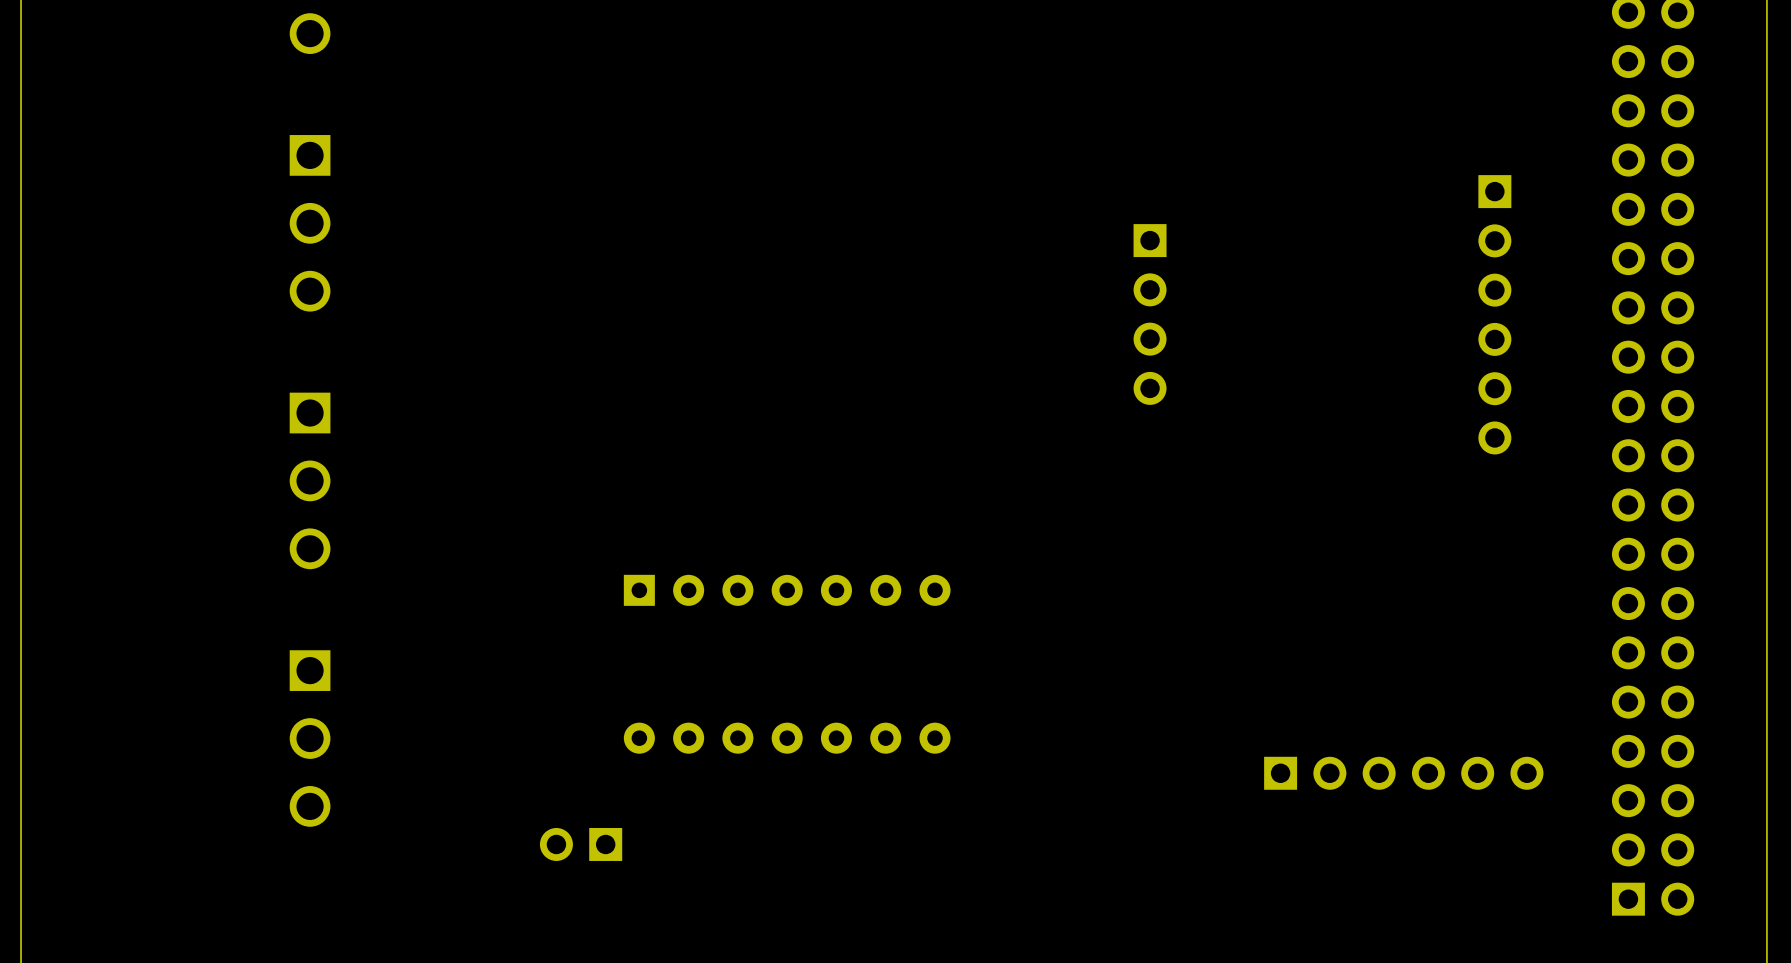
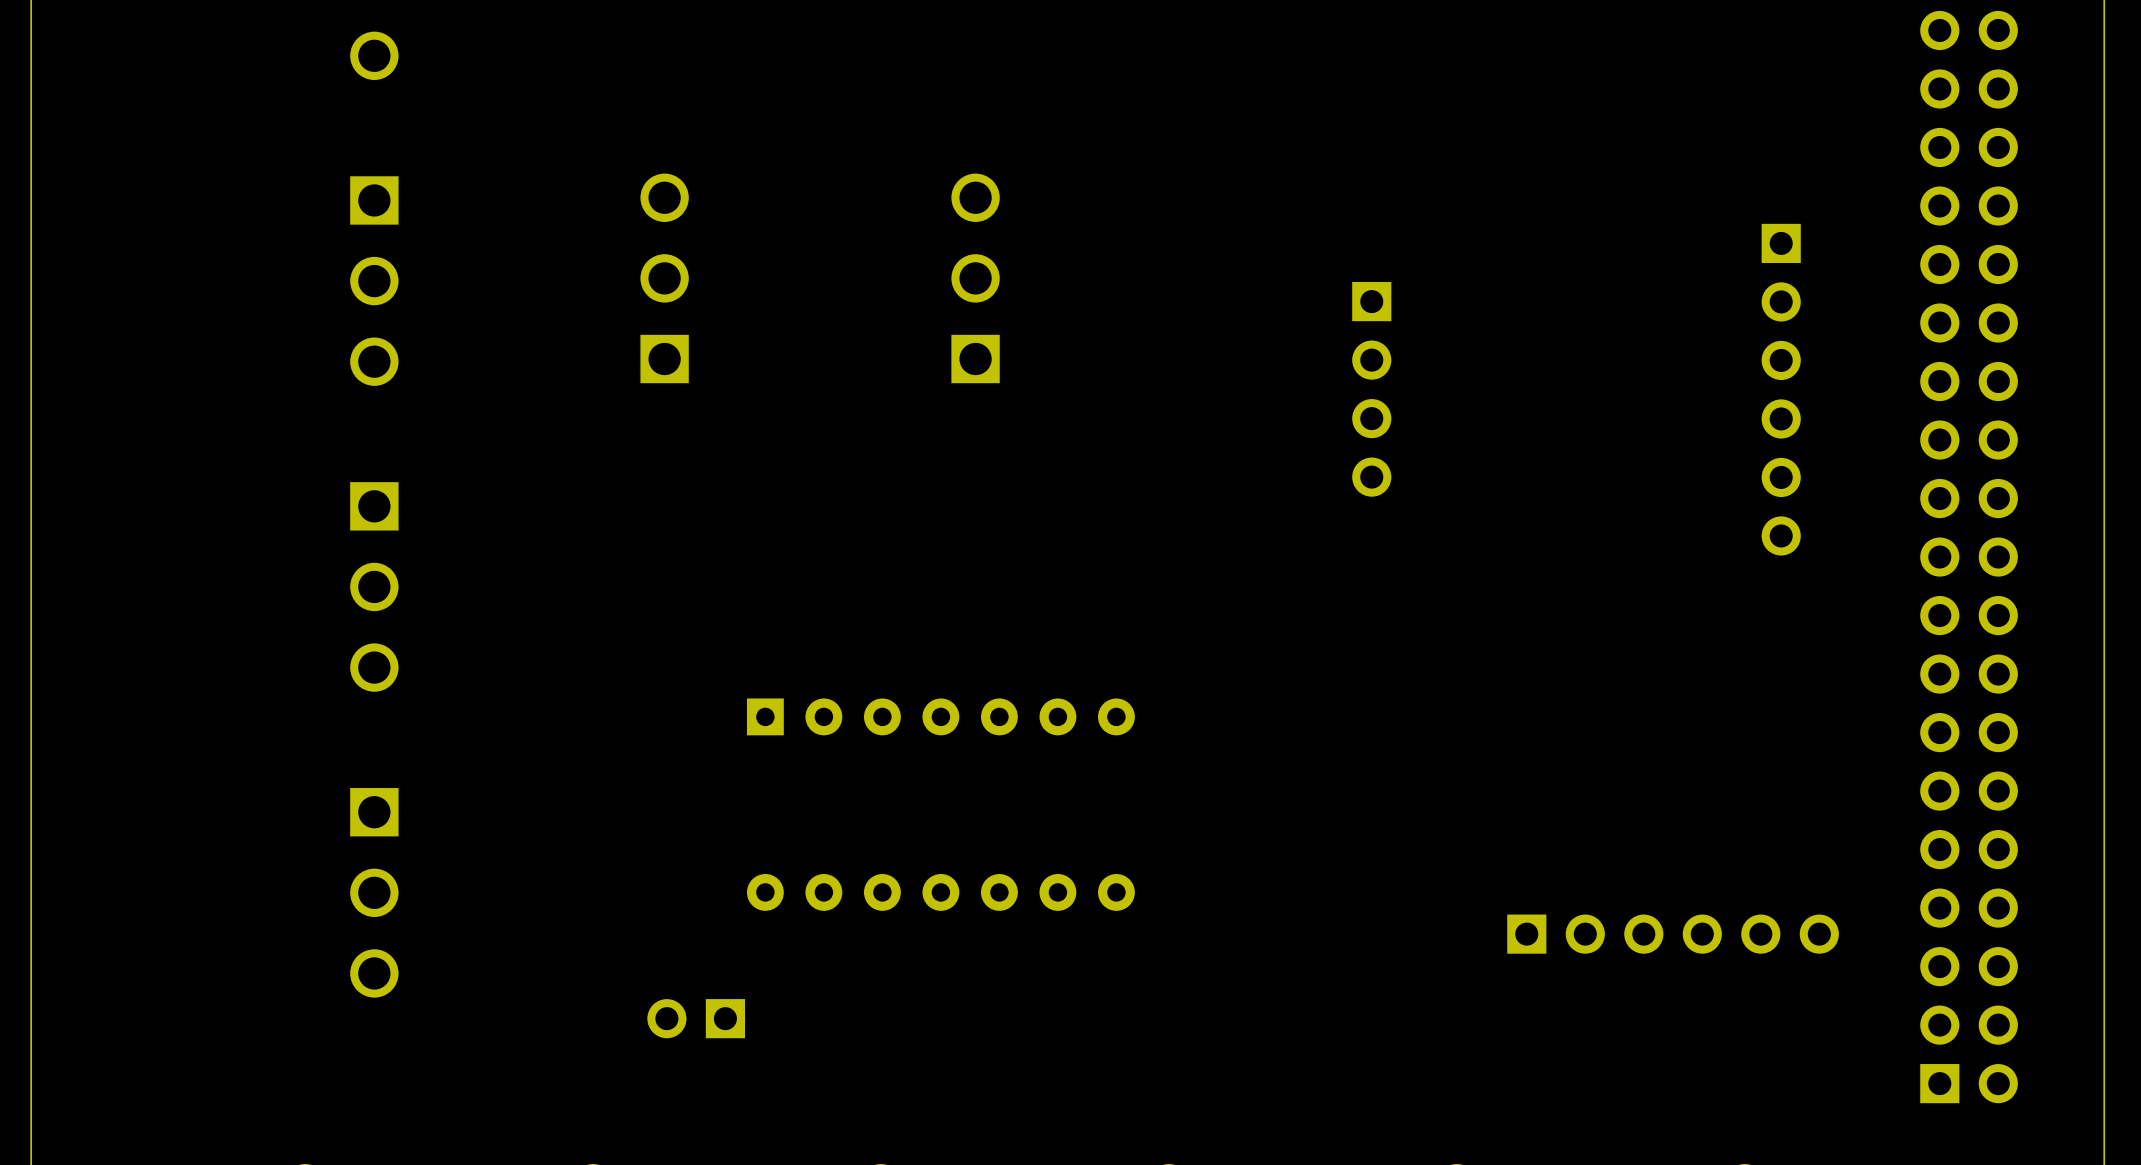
part: none -> (664, 278)
part: none -> (975, 278)

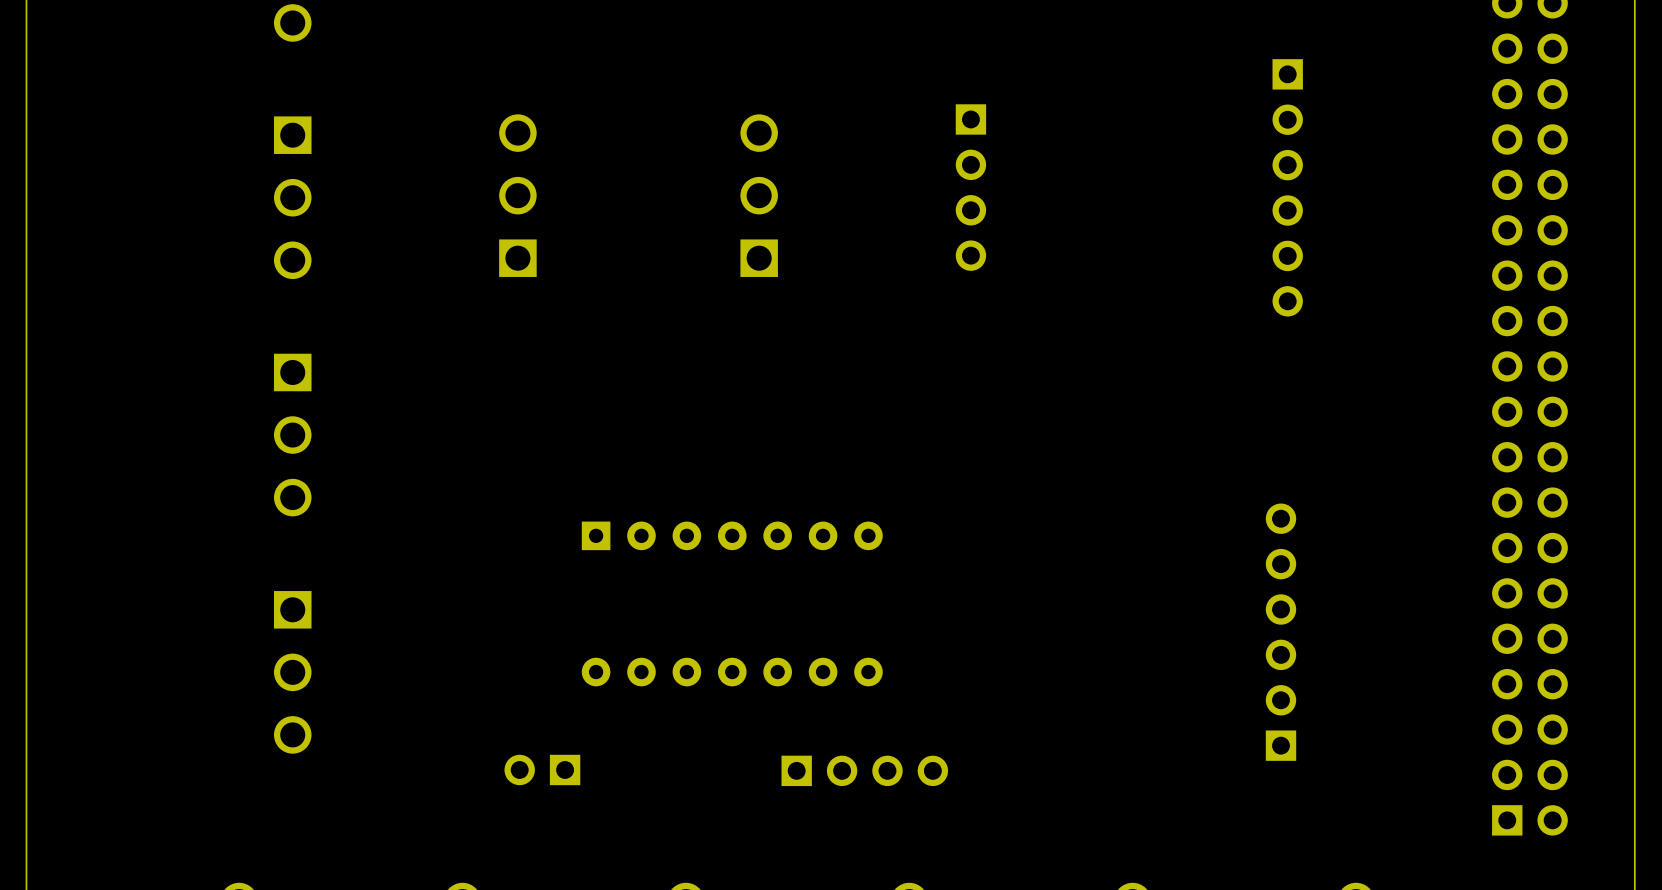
part position: (1371, 389) -> (970, 187)
part position: (1781, 389) -> (1287, 187)
part rotation: 0° (1673, 934) -> 90° counterclockwise (1281, 632)
part: none -> (864, 770)

